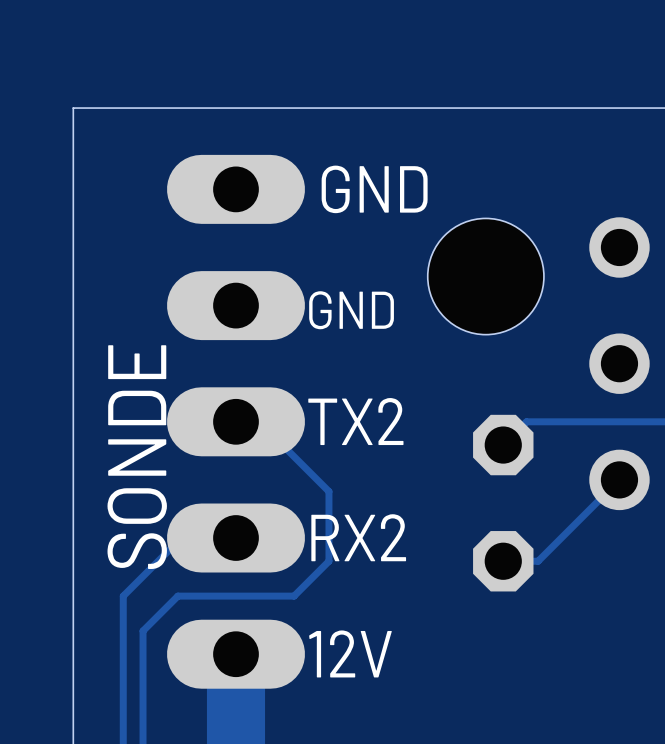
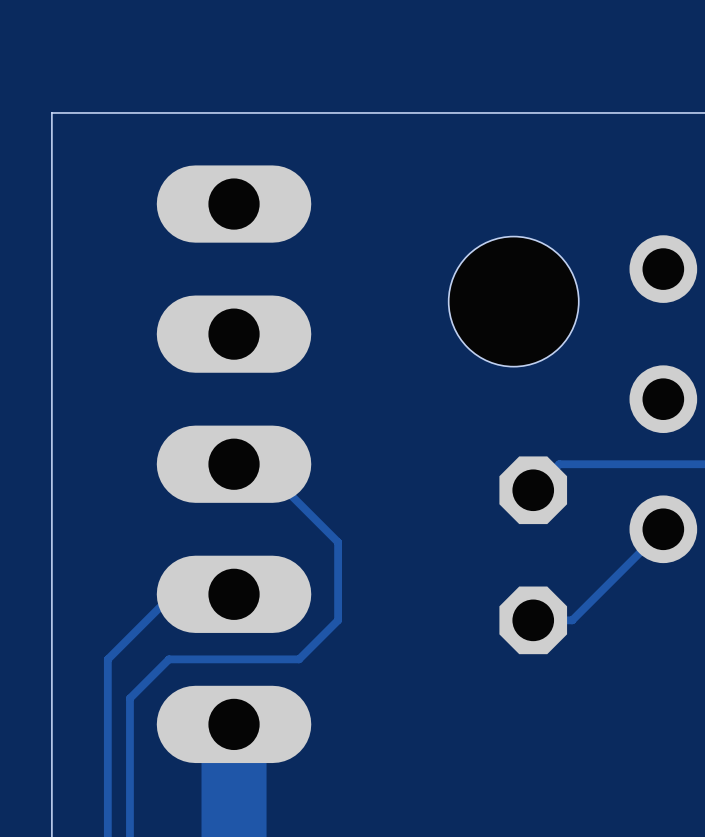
text: GND (374, 189) -> none
text: GND (351, 310) -> none
text: TX2 (355, 421) -> none
text: SONDE (137, 457) -> none
text: RX2 (358, 537) -> none
text: 12V (350, 653) -> none

